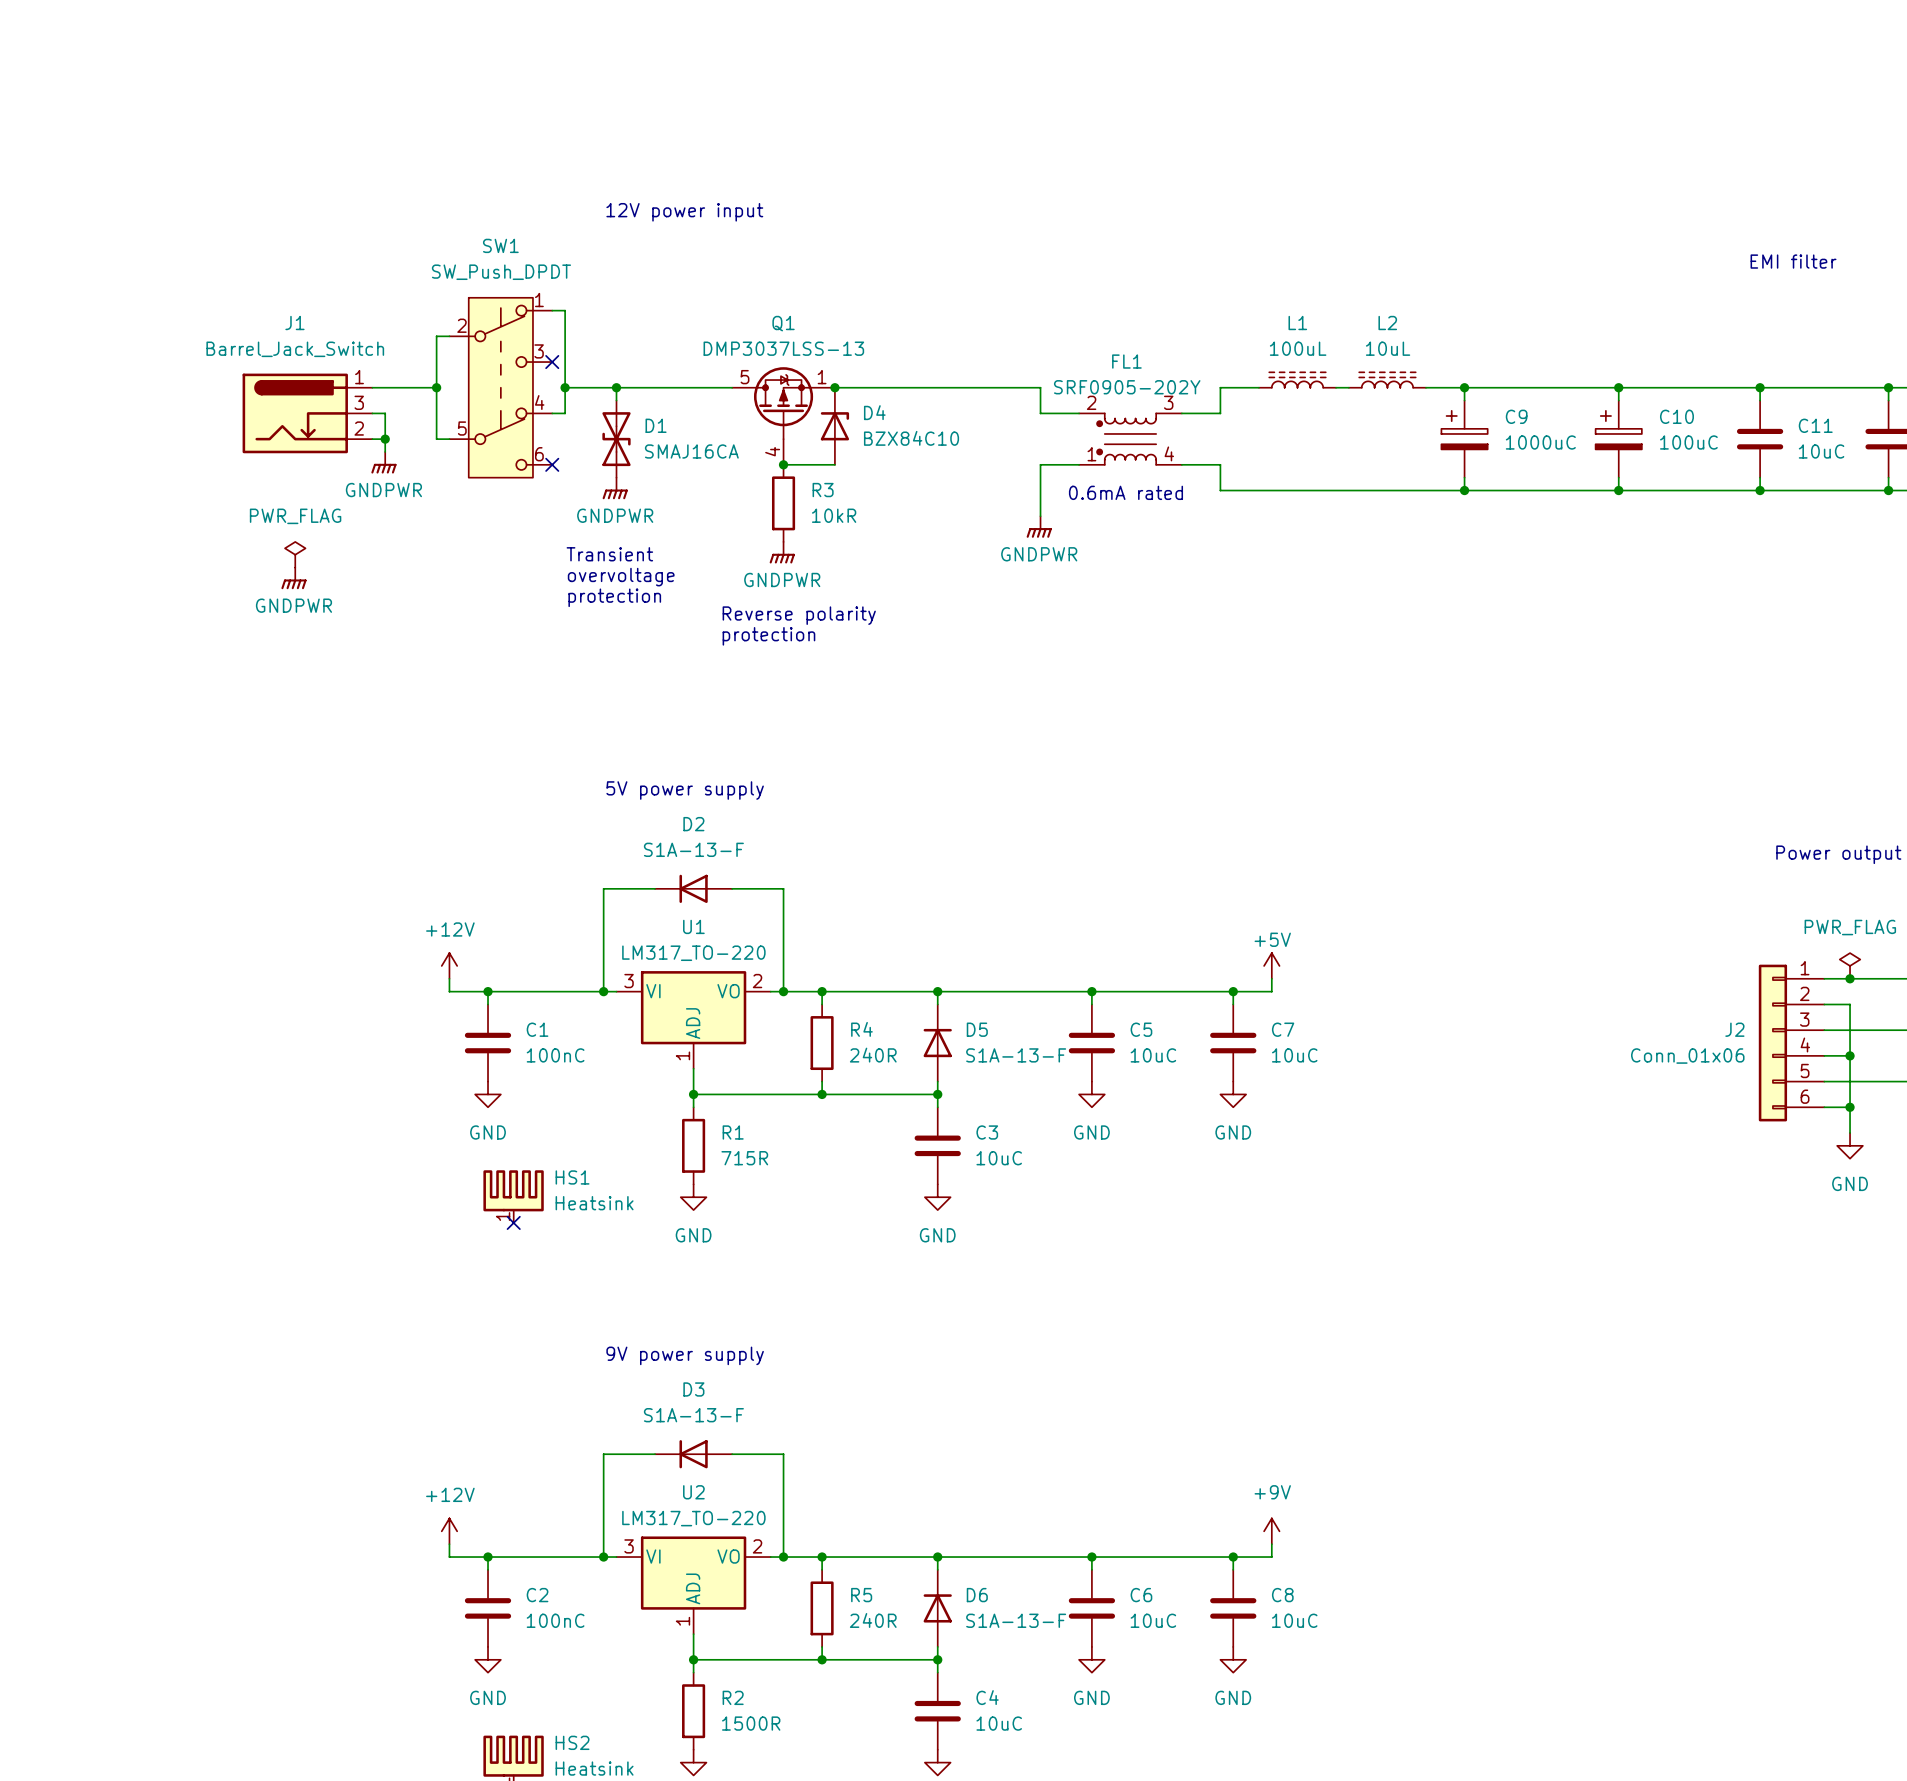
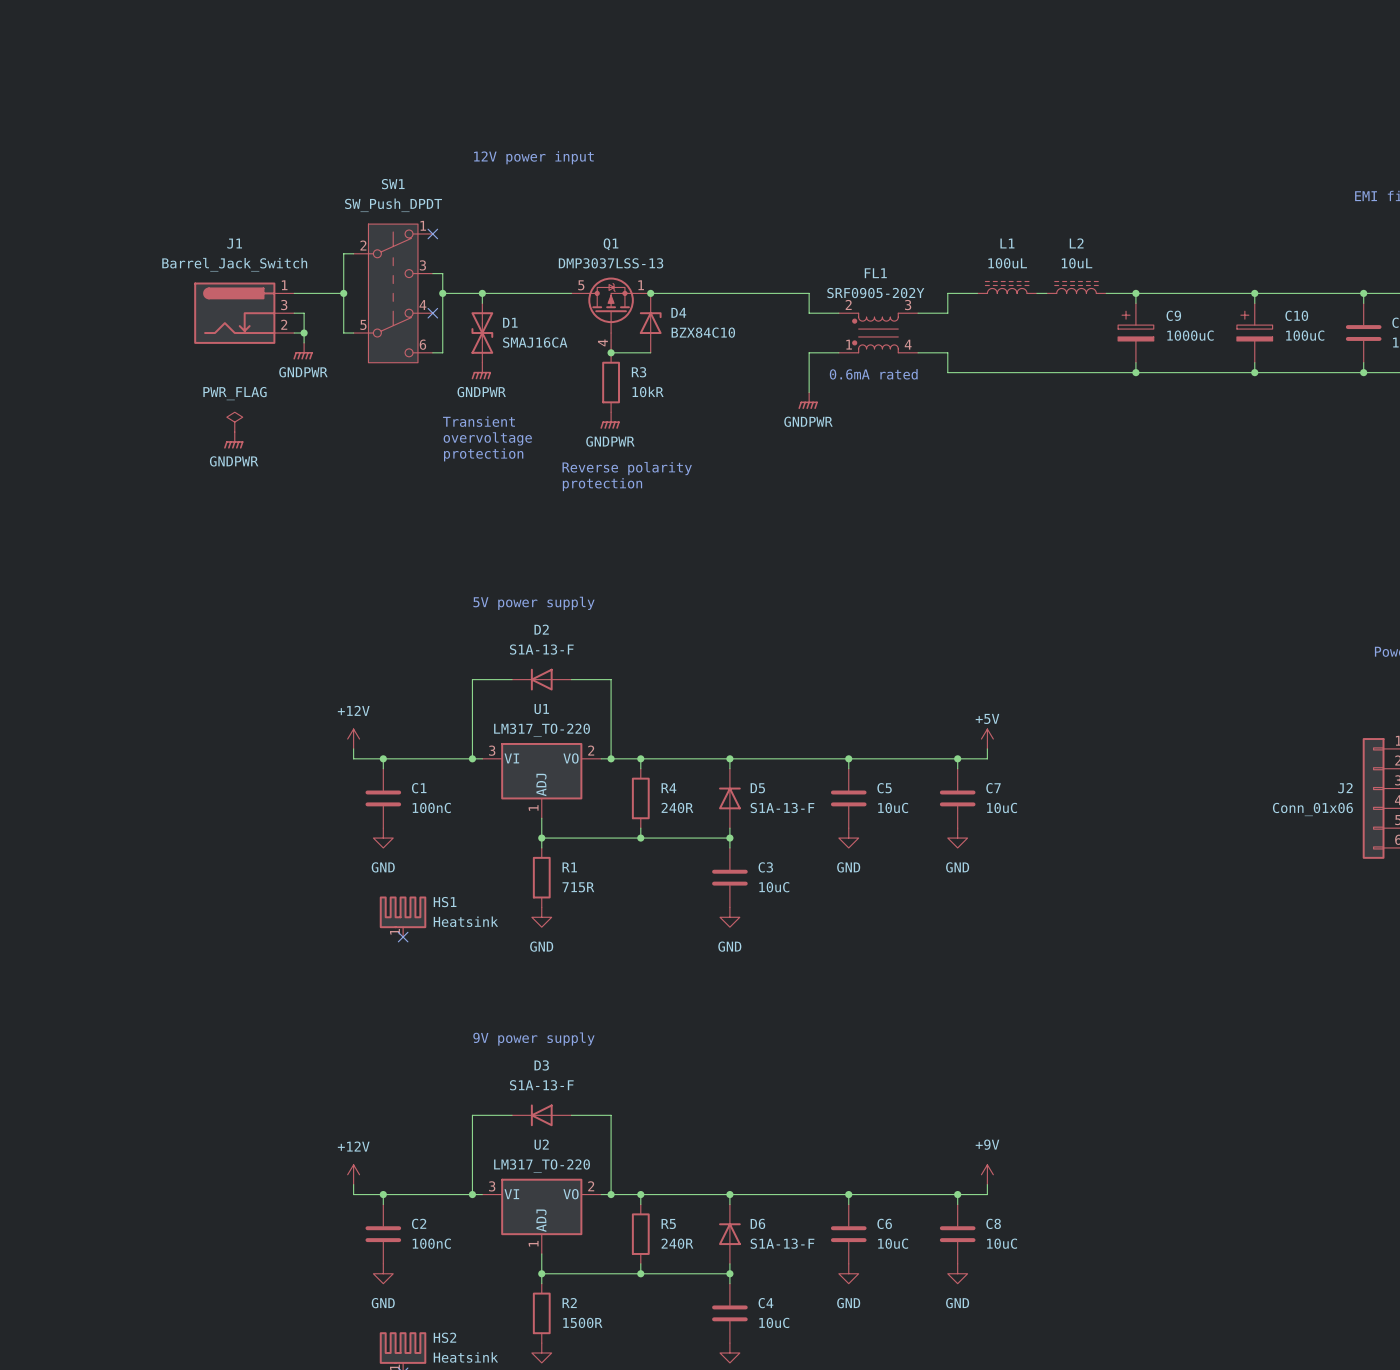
wire: (552, 310) (565, 310) (565, 362) -> (432, 273) (442, 273)
no-connect mark: none -> (432, 233)
no-connect mark: (552, 362) -> none
wire: (552, 413) (565, 413) -> (432, 352) (442, 352) (442, 313)
no-connect mark: none -> (432, 313)
no-connect mark: (552, 464) -> none

